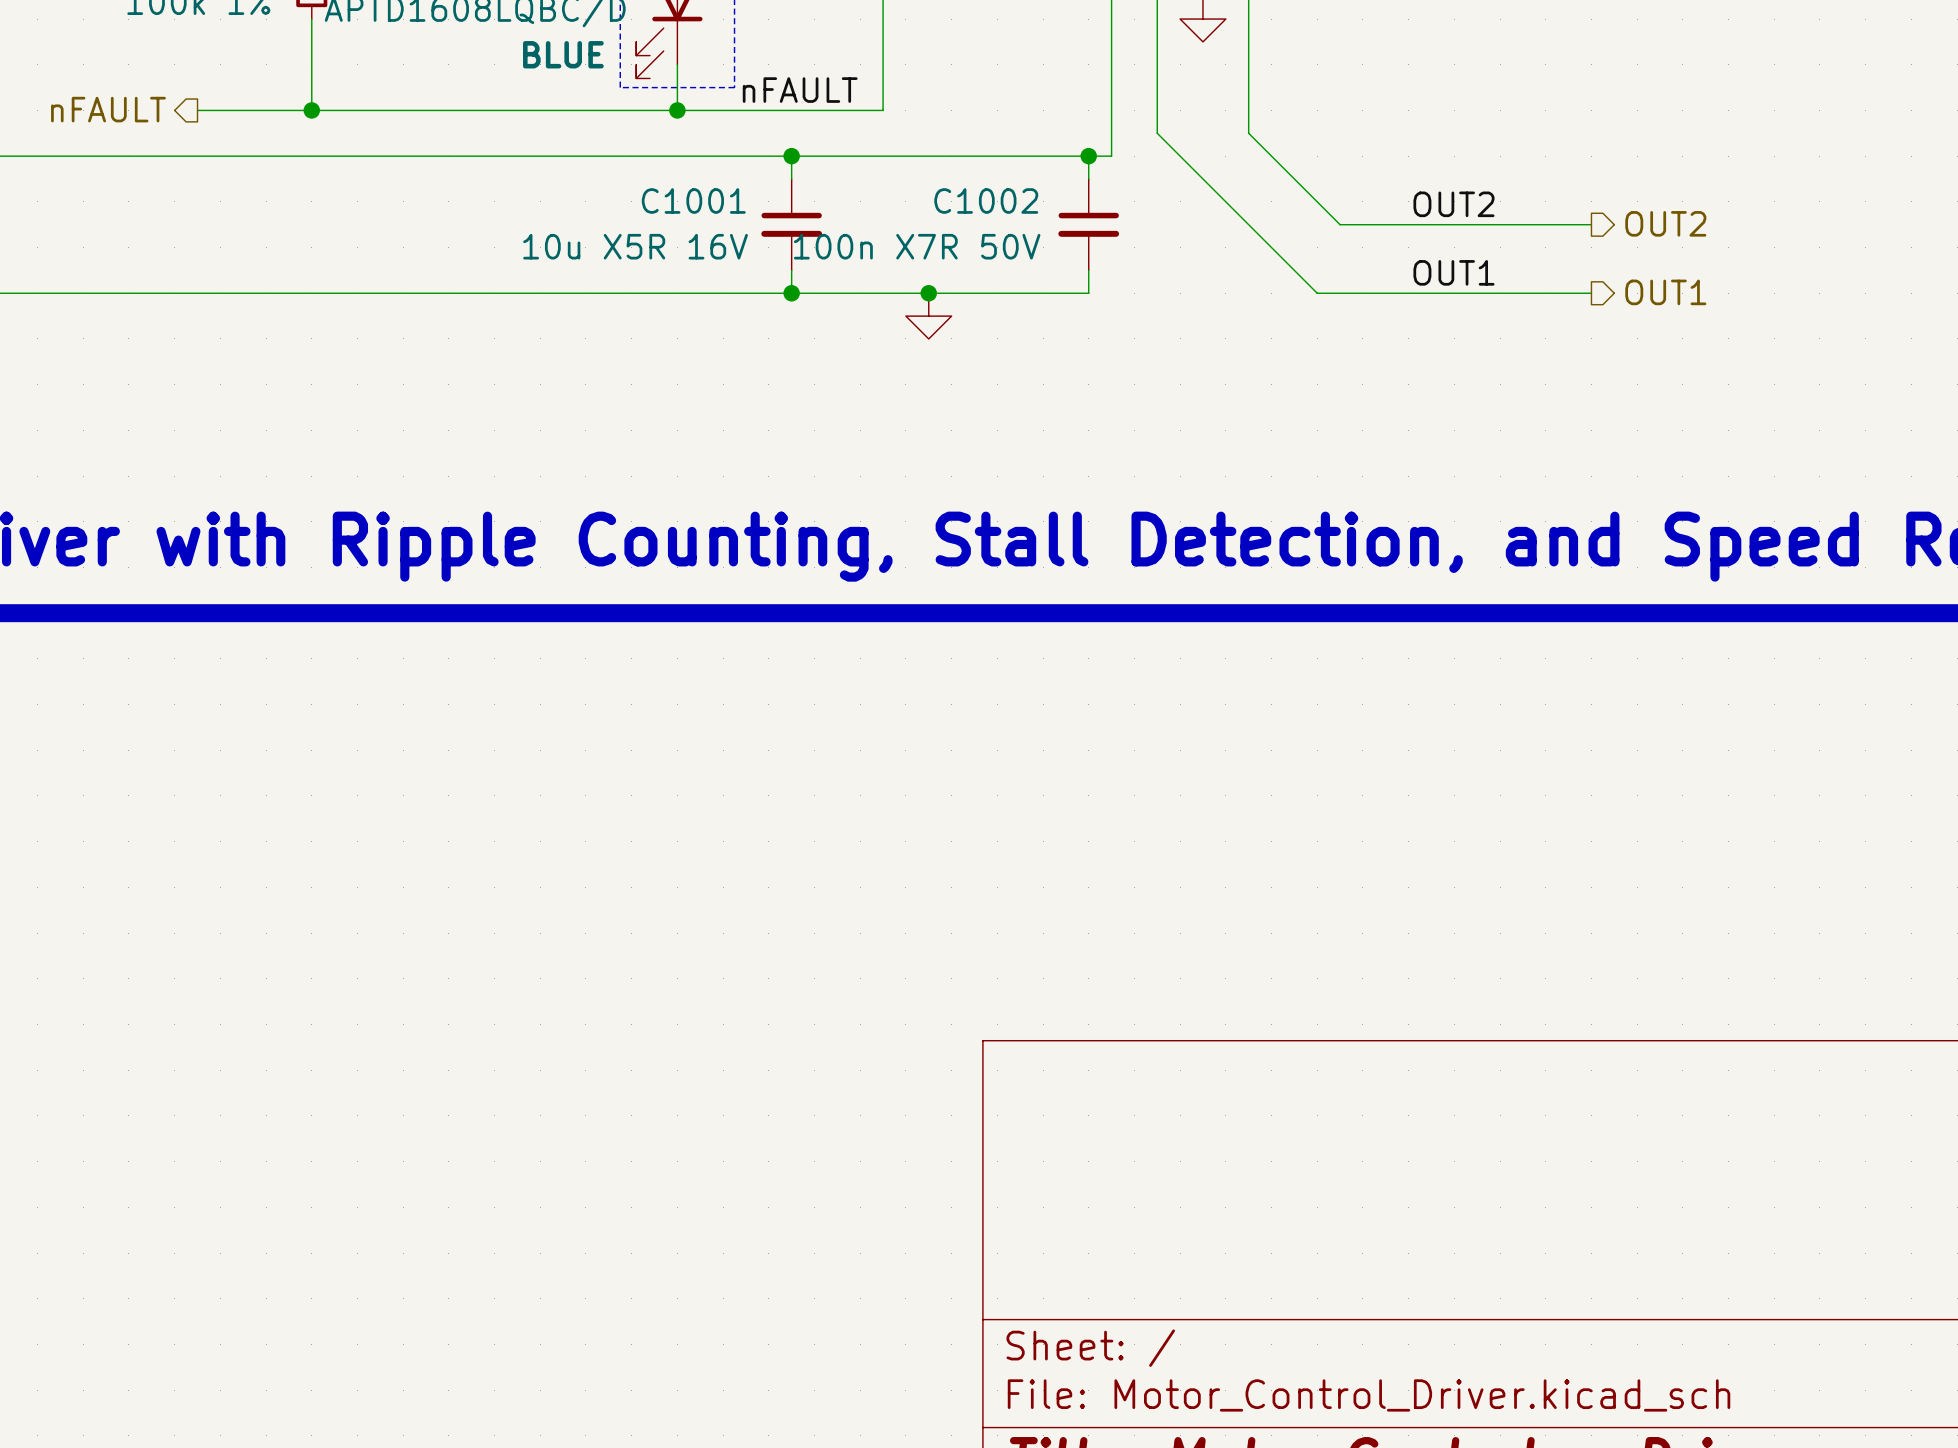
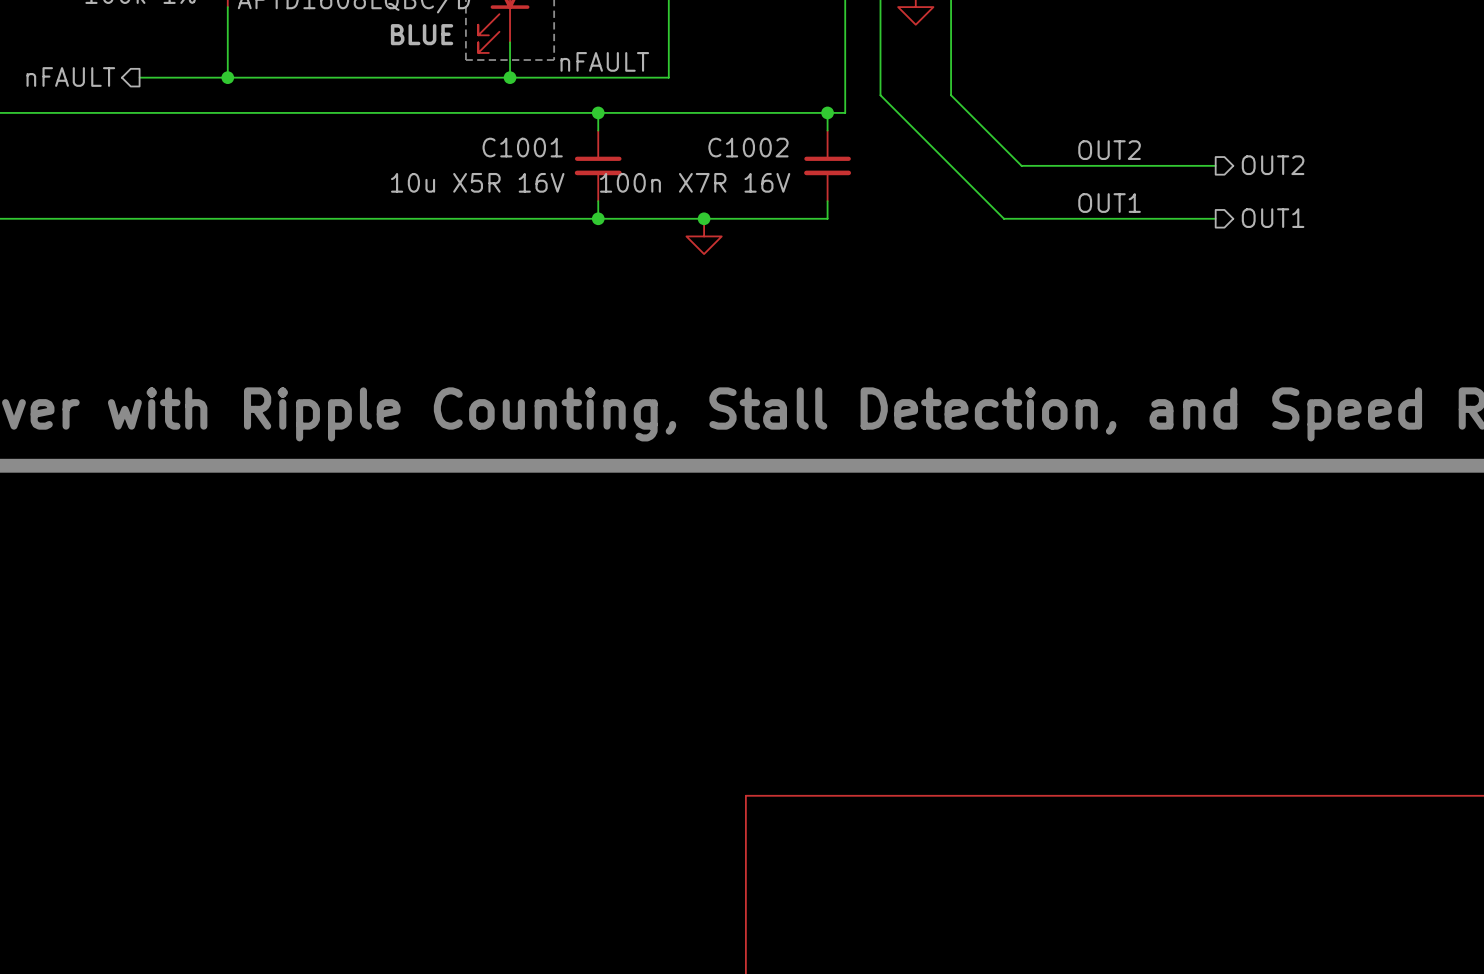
C1002 value: 100n X7R 50V (917, 246) -> 100n X7R 16V (695, 182)

